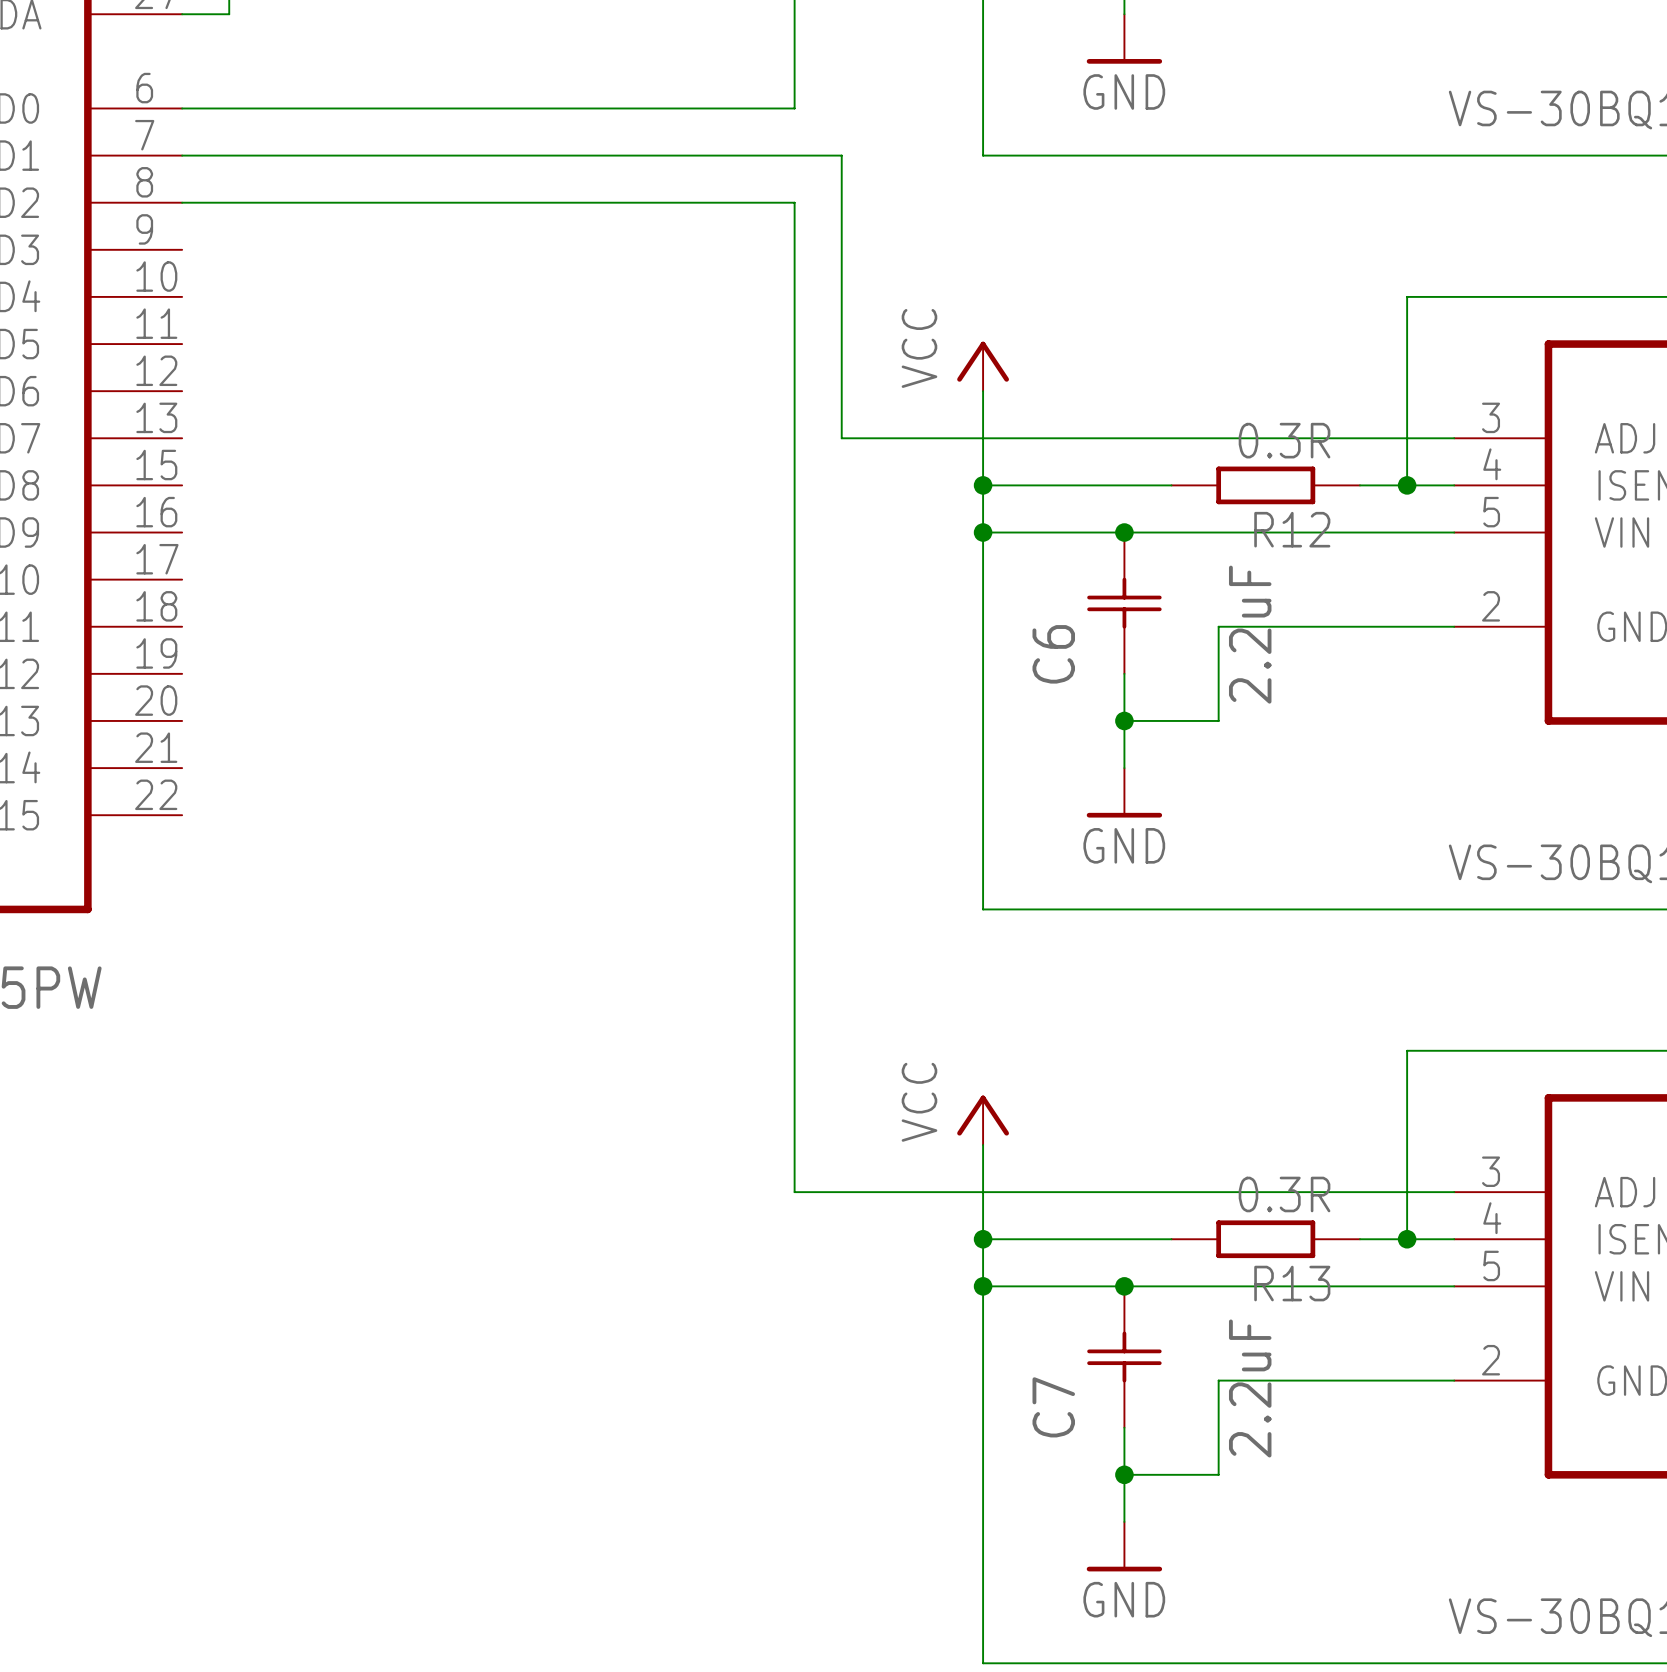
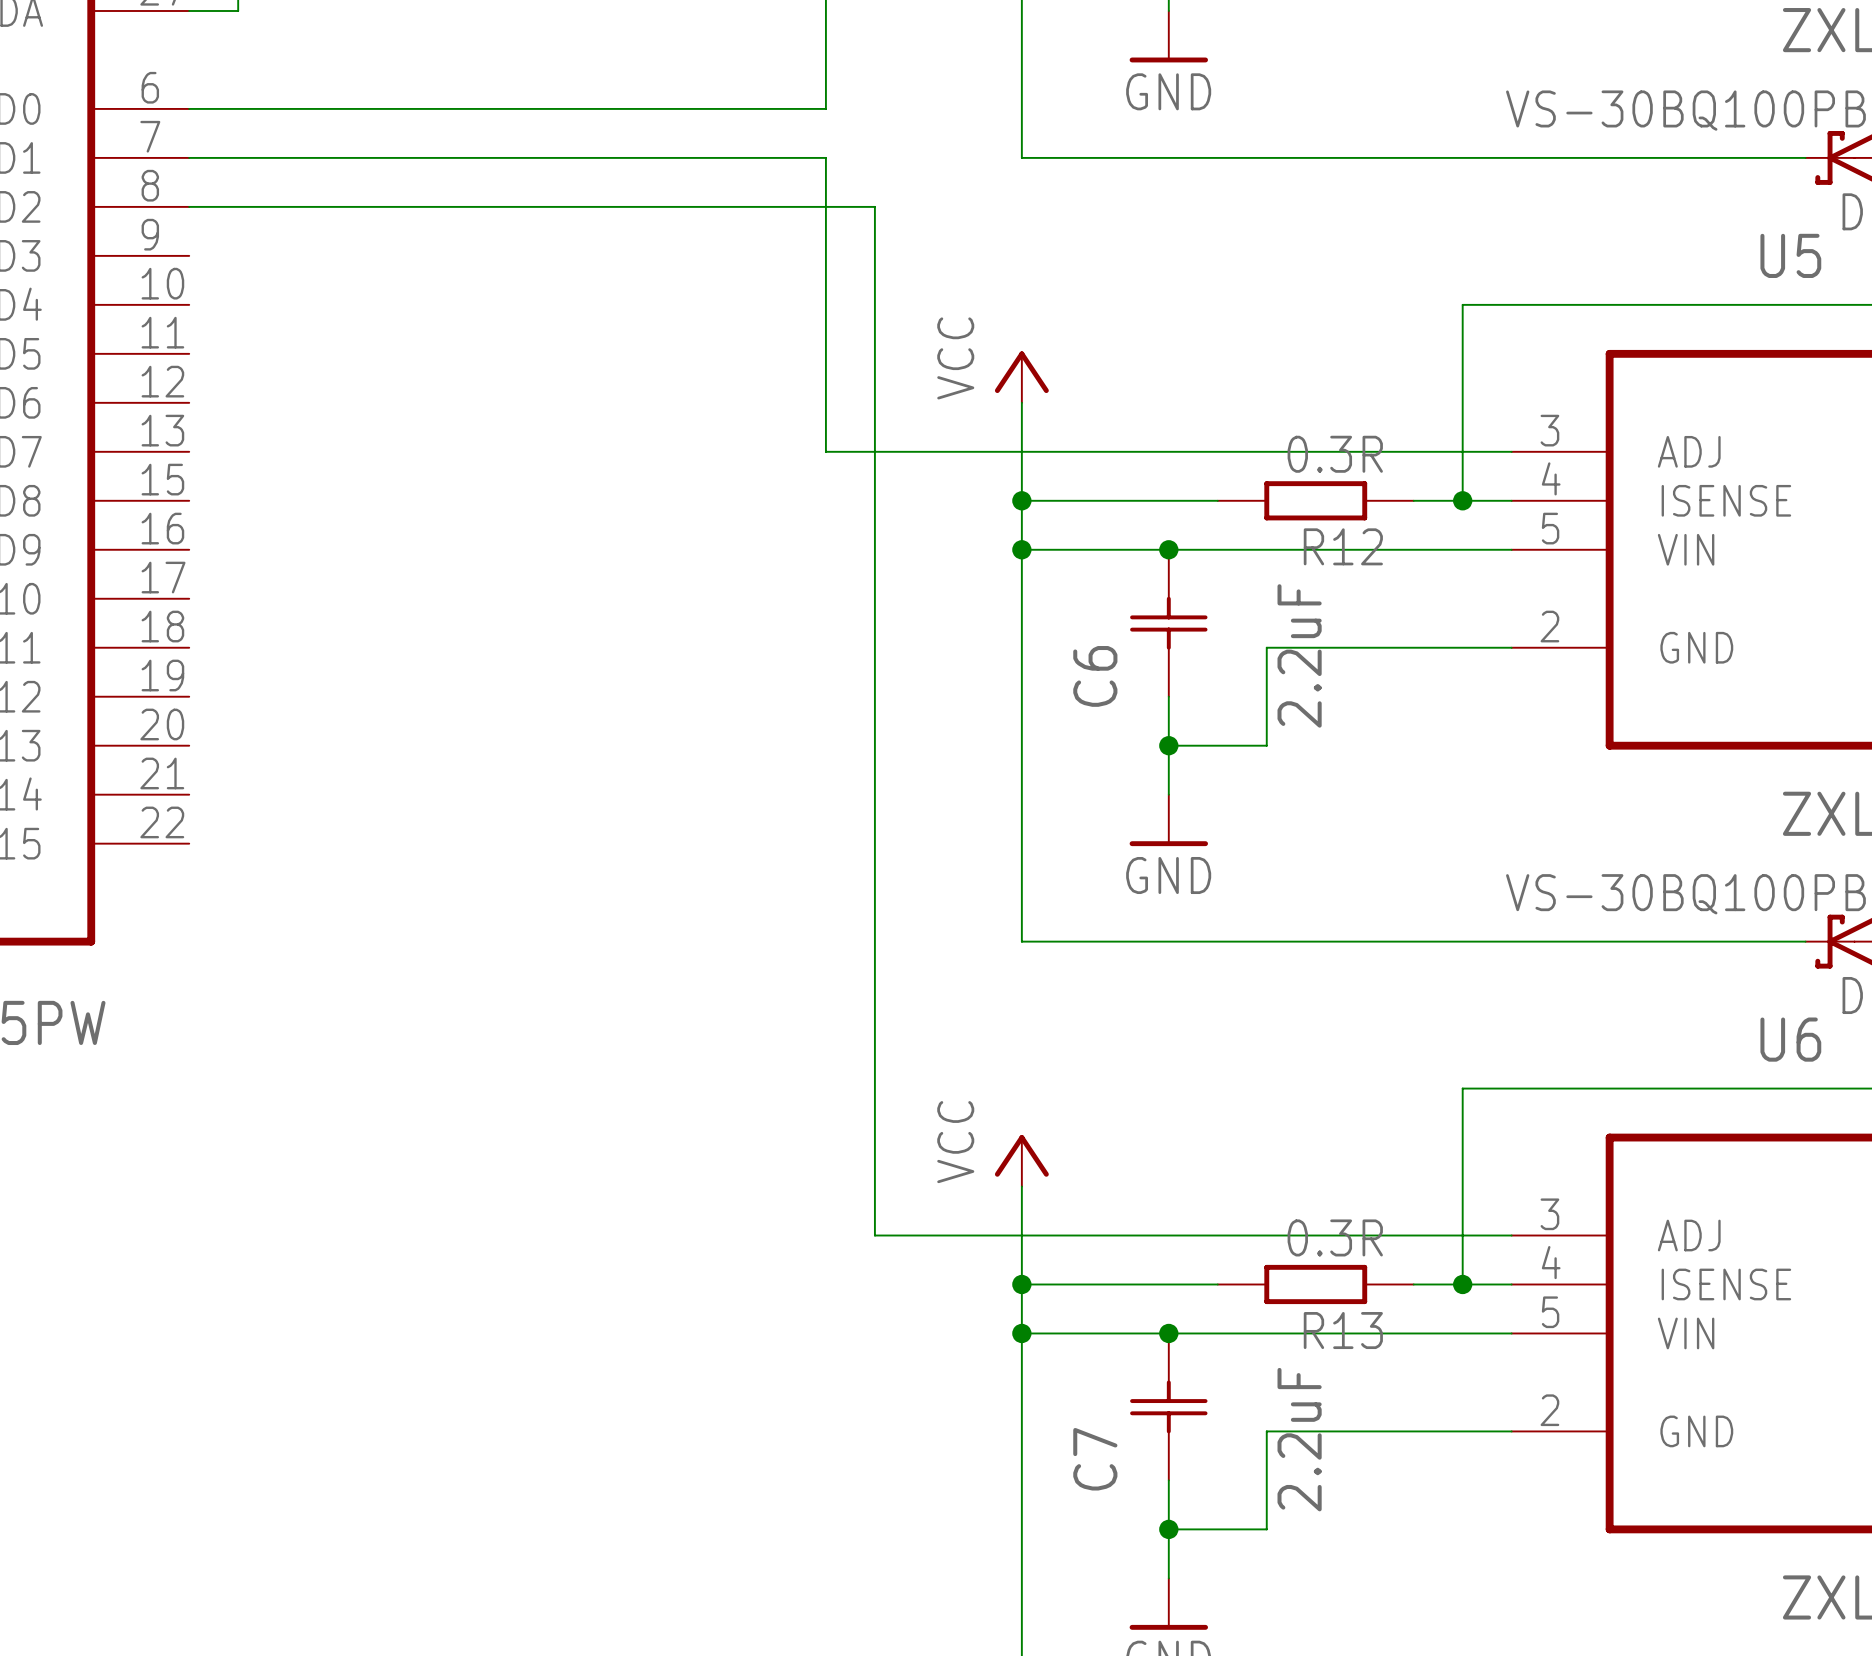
wire: (794, 155) (841, 155) (841, 202) -> (825, 157) (825, 206) (874, 206)
wire: (794, 438) (794, 1192) (841, 1192) -> (825, 451) (874, 451) (874, 1235)

